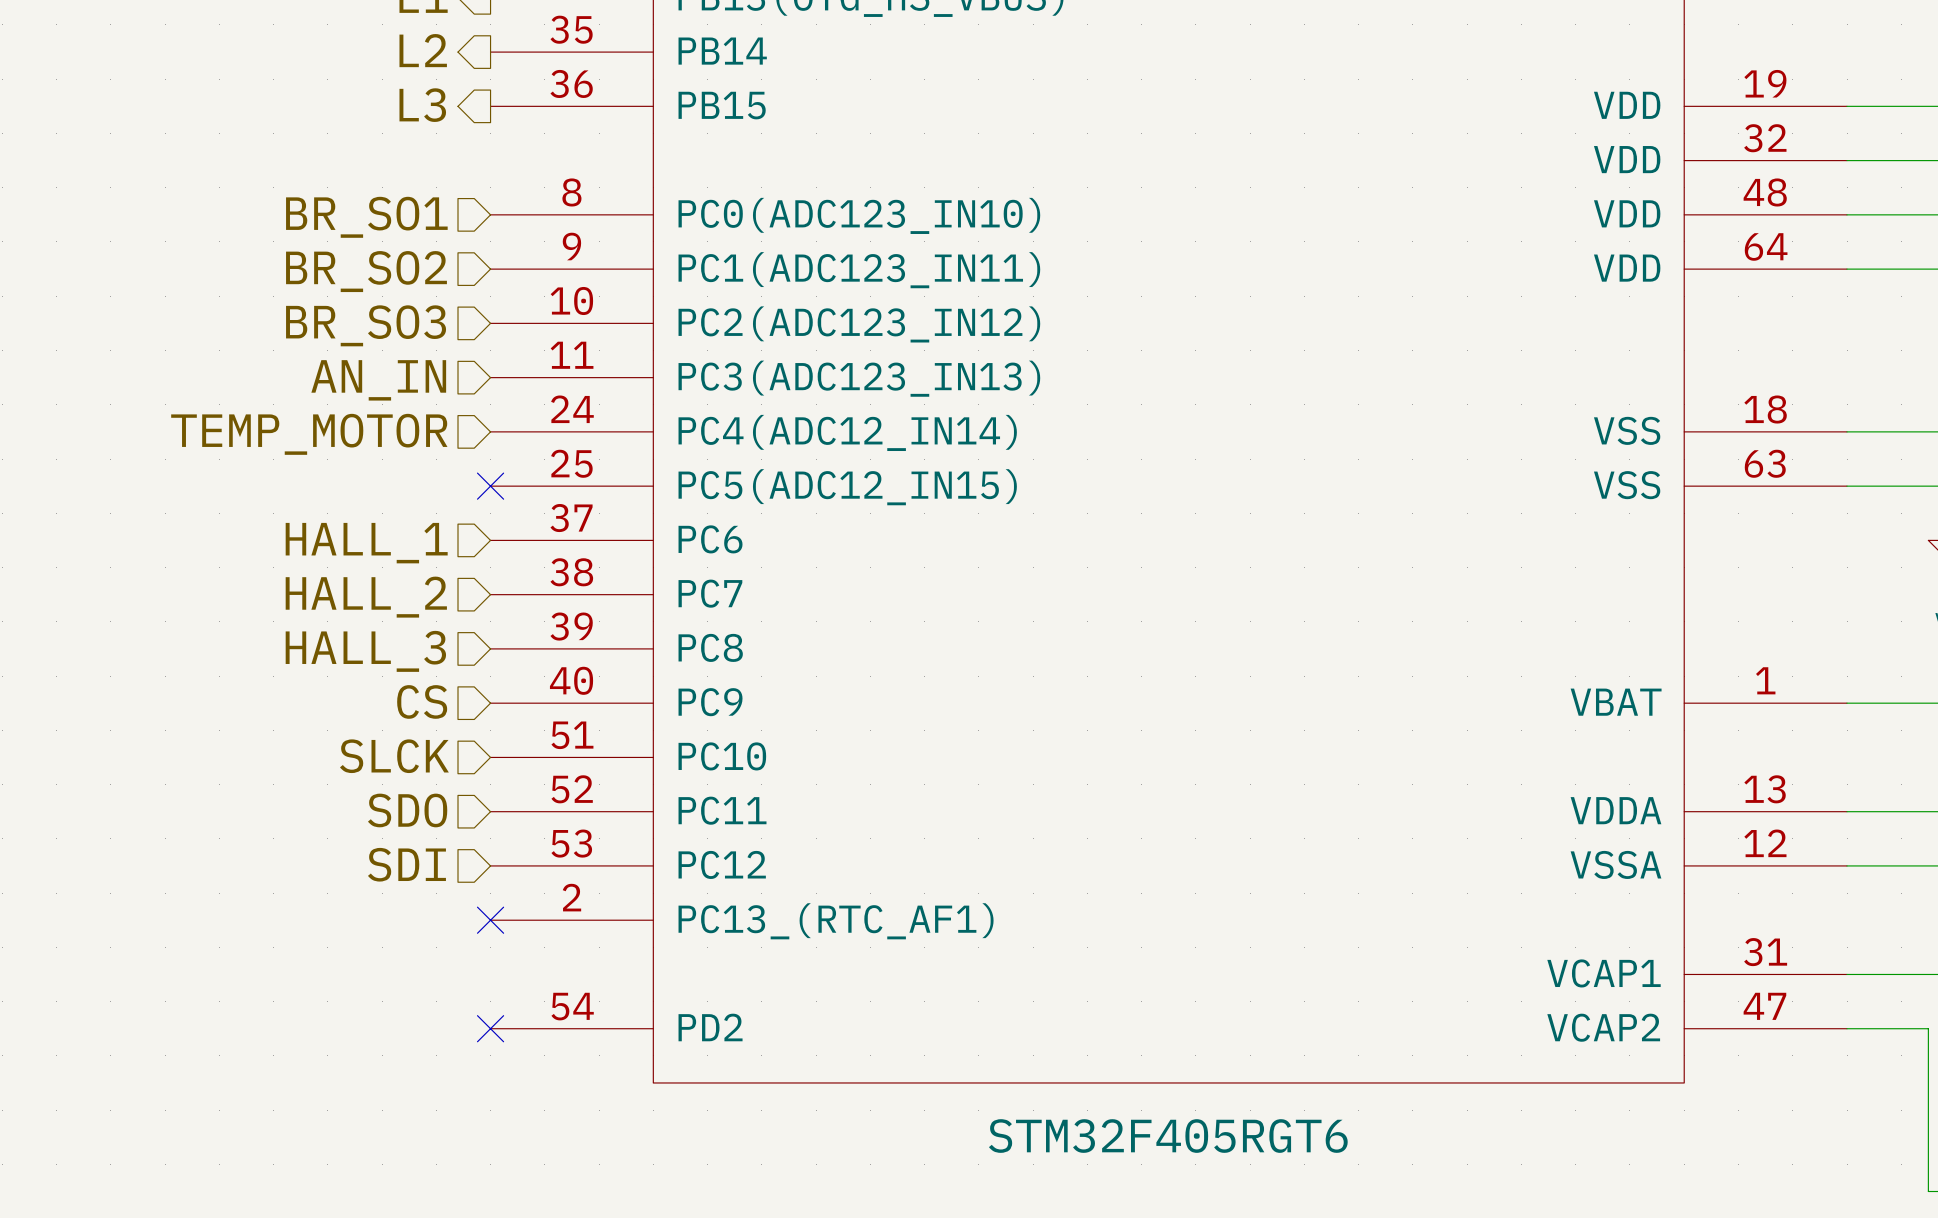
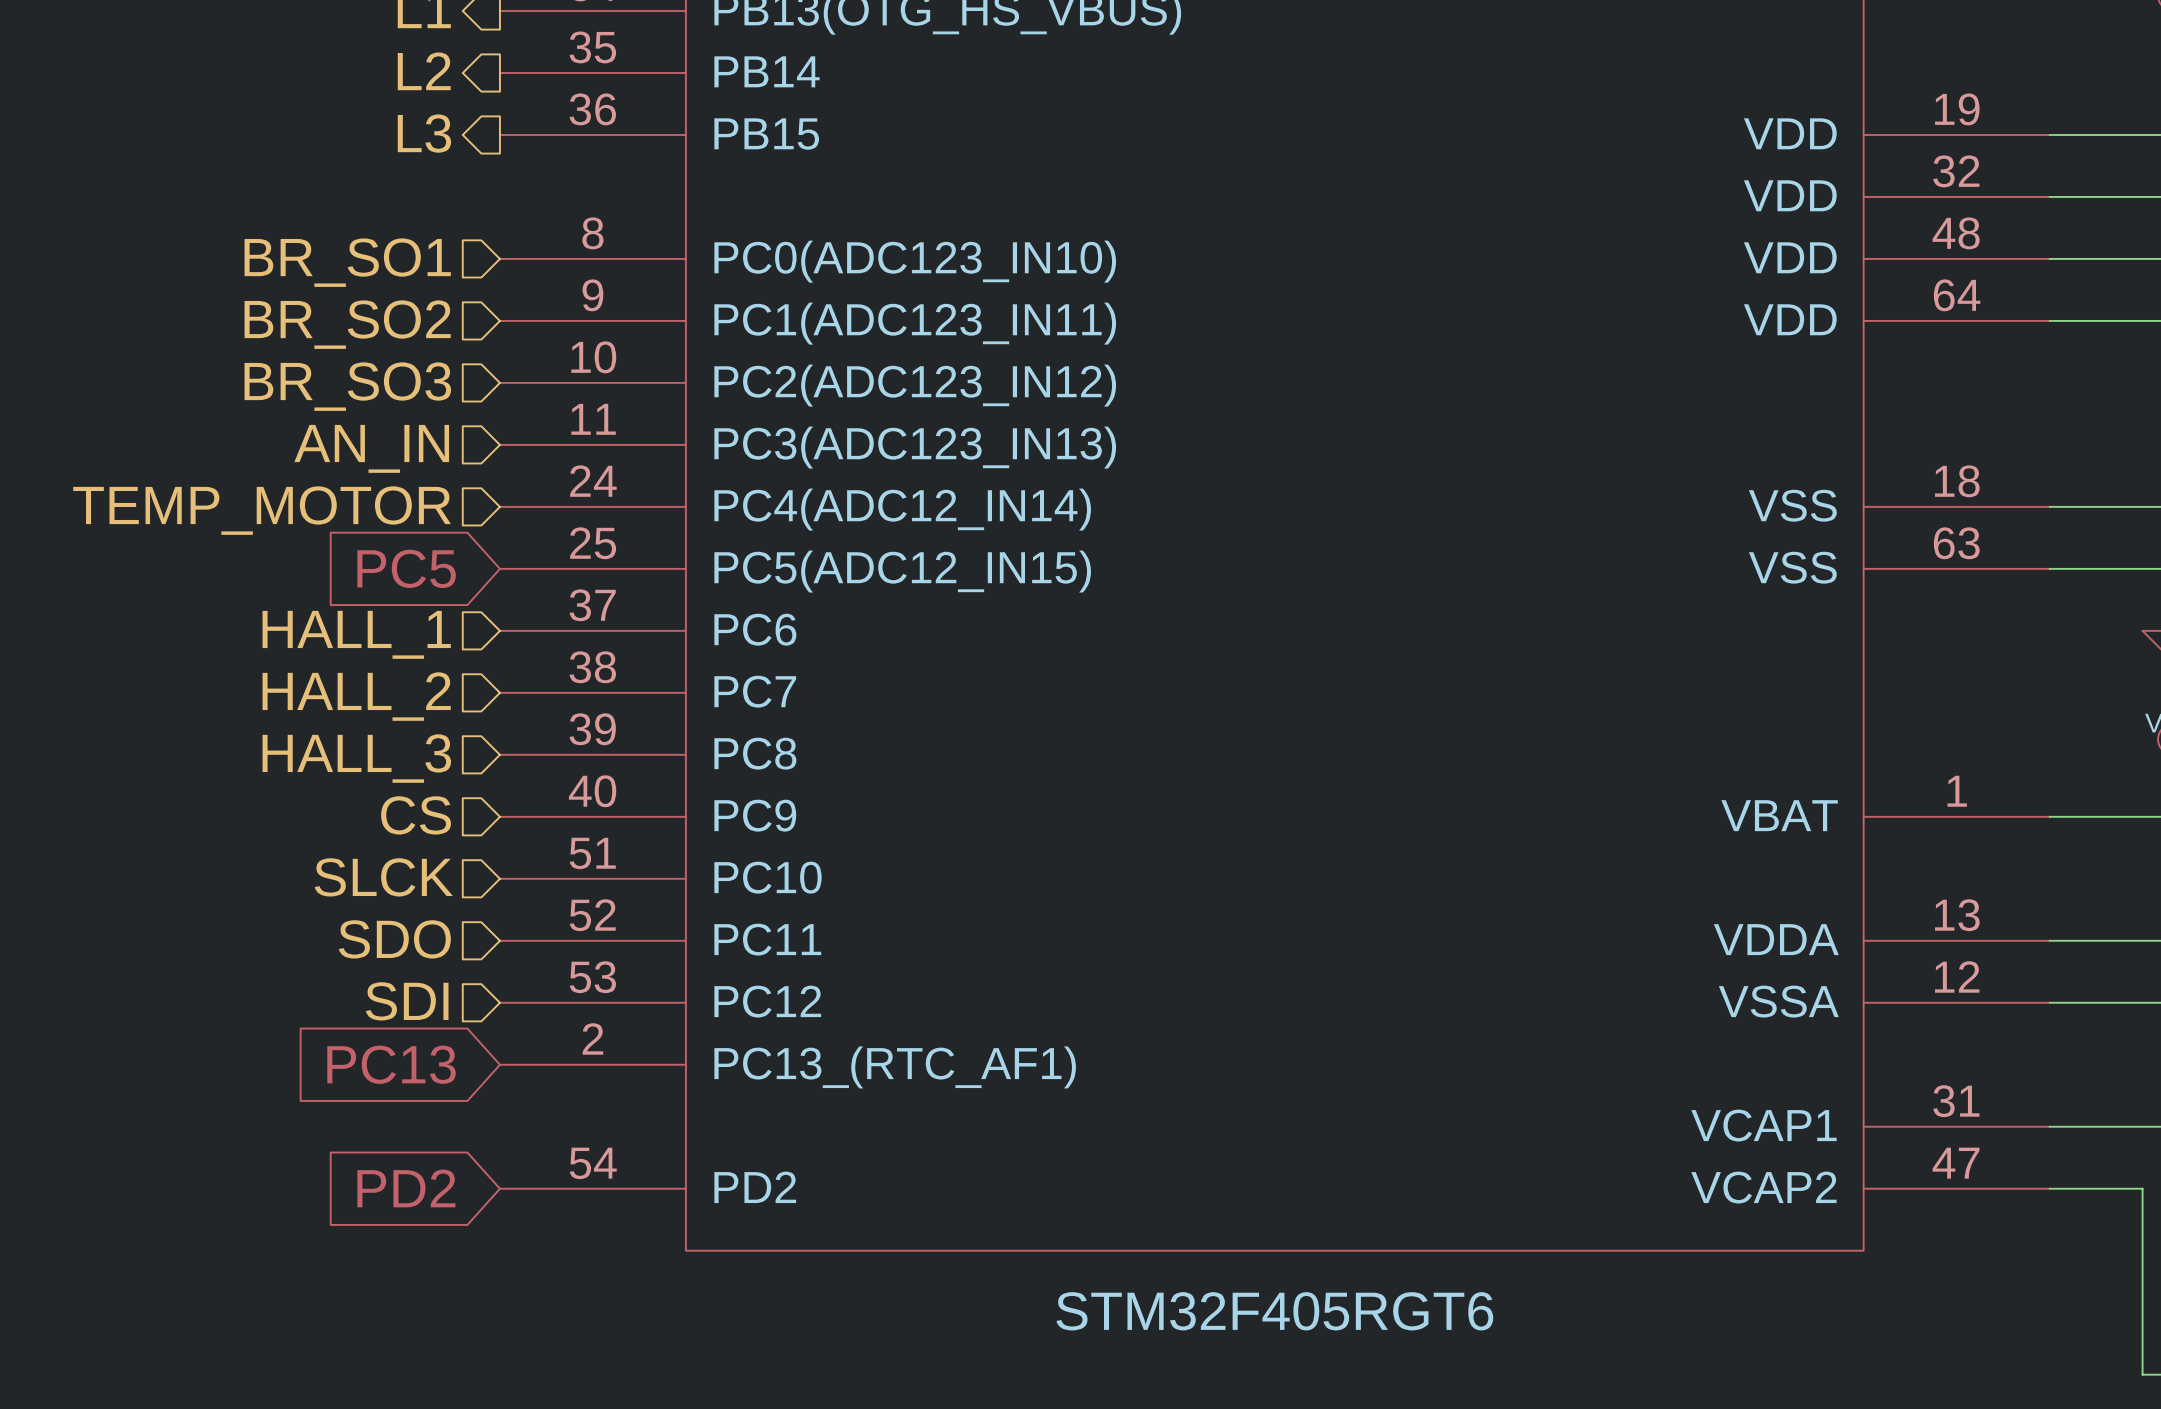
global label: none -> PC5 (406, 568)
no-connect mark: (490, 486) -> none
global label: none -> PC13 (391, 1064)
no-connect mark: (490, 920) -> none
global label: none -> PD2 (406, 1188)
no-connect mark: (490, 1028) -> none

